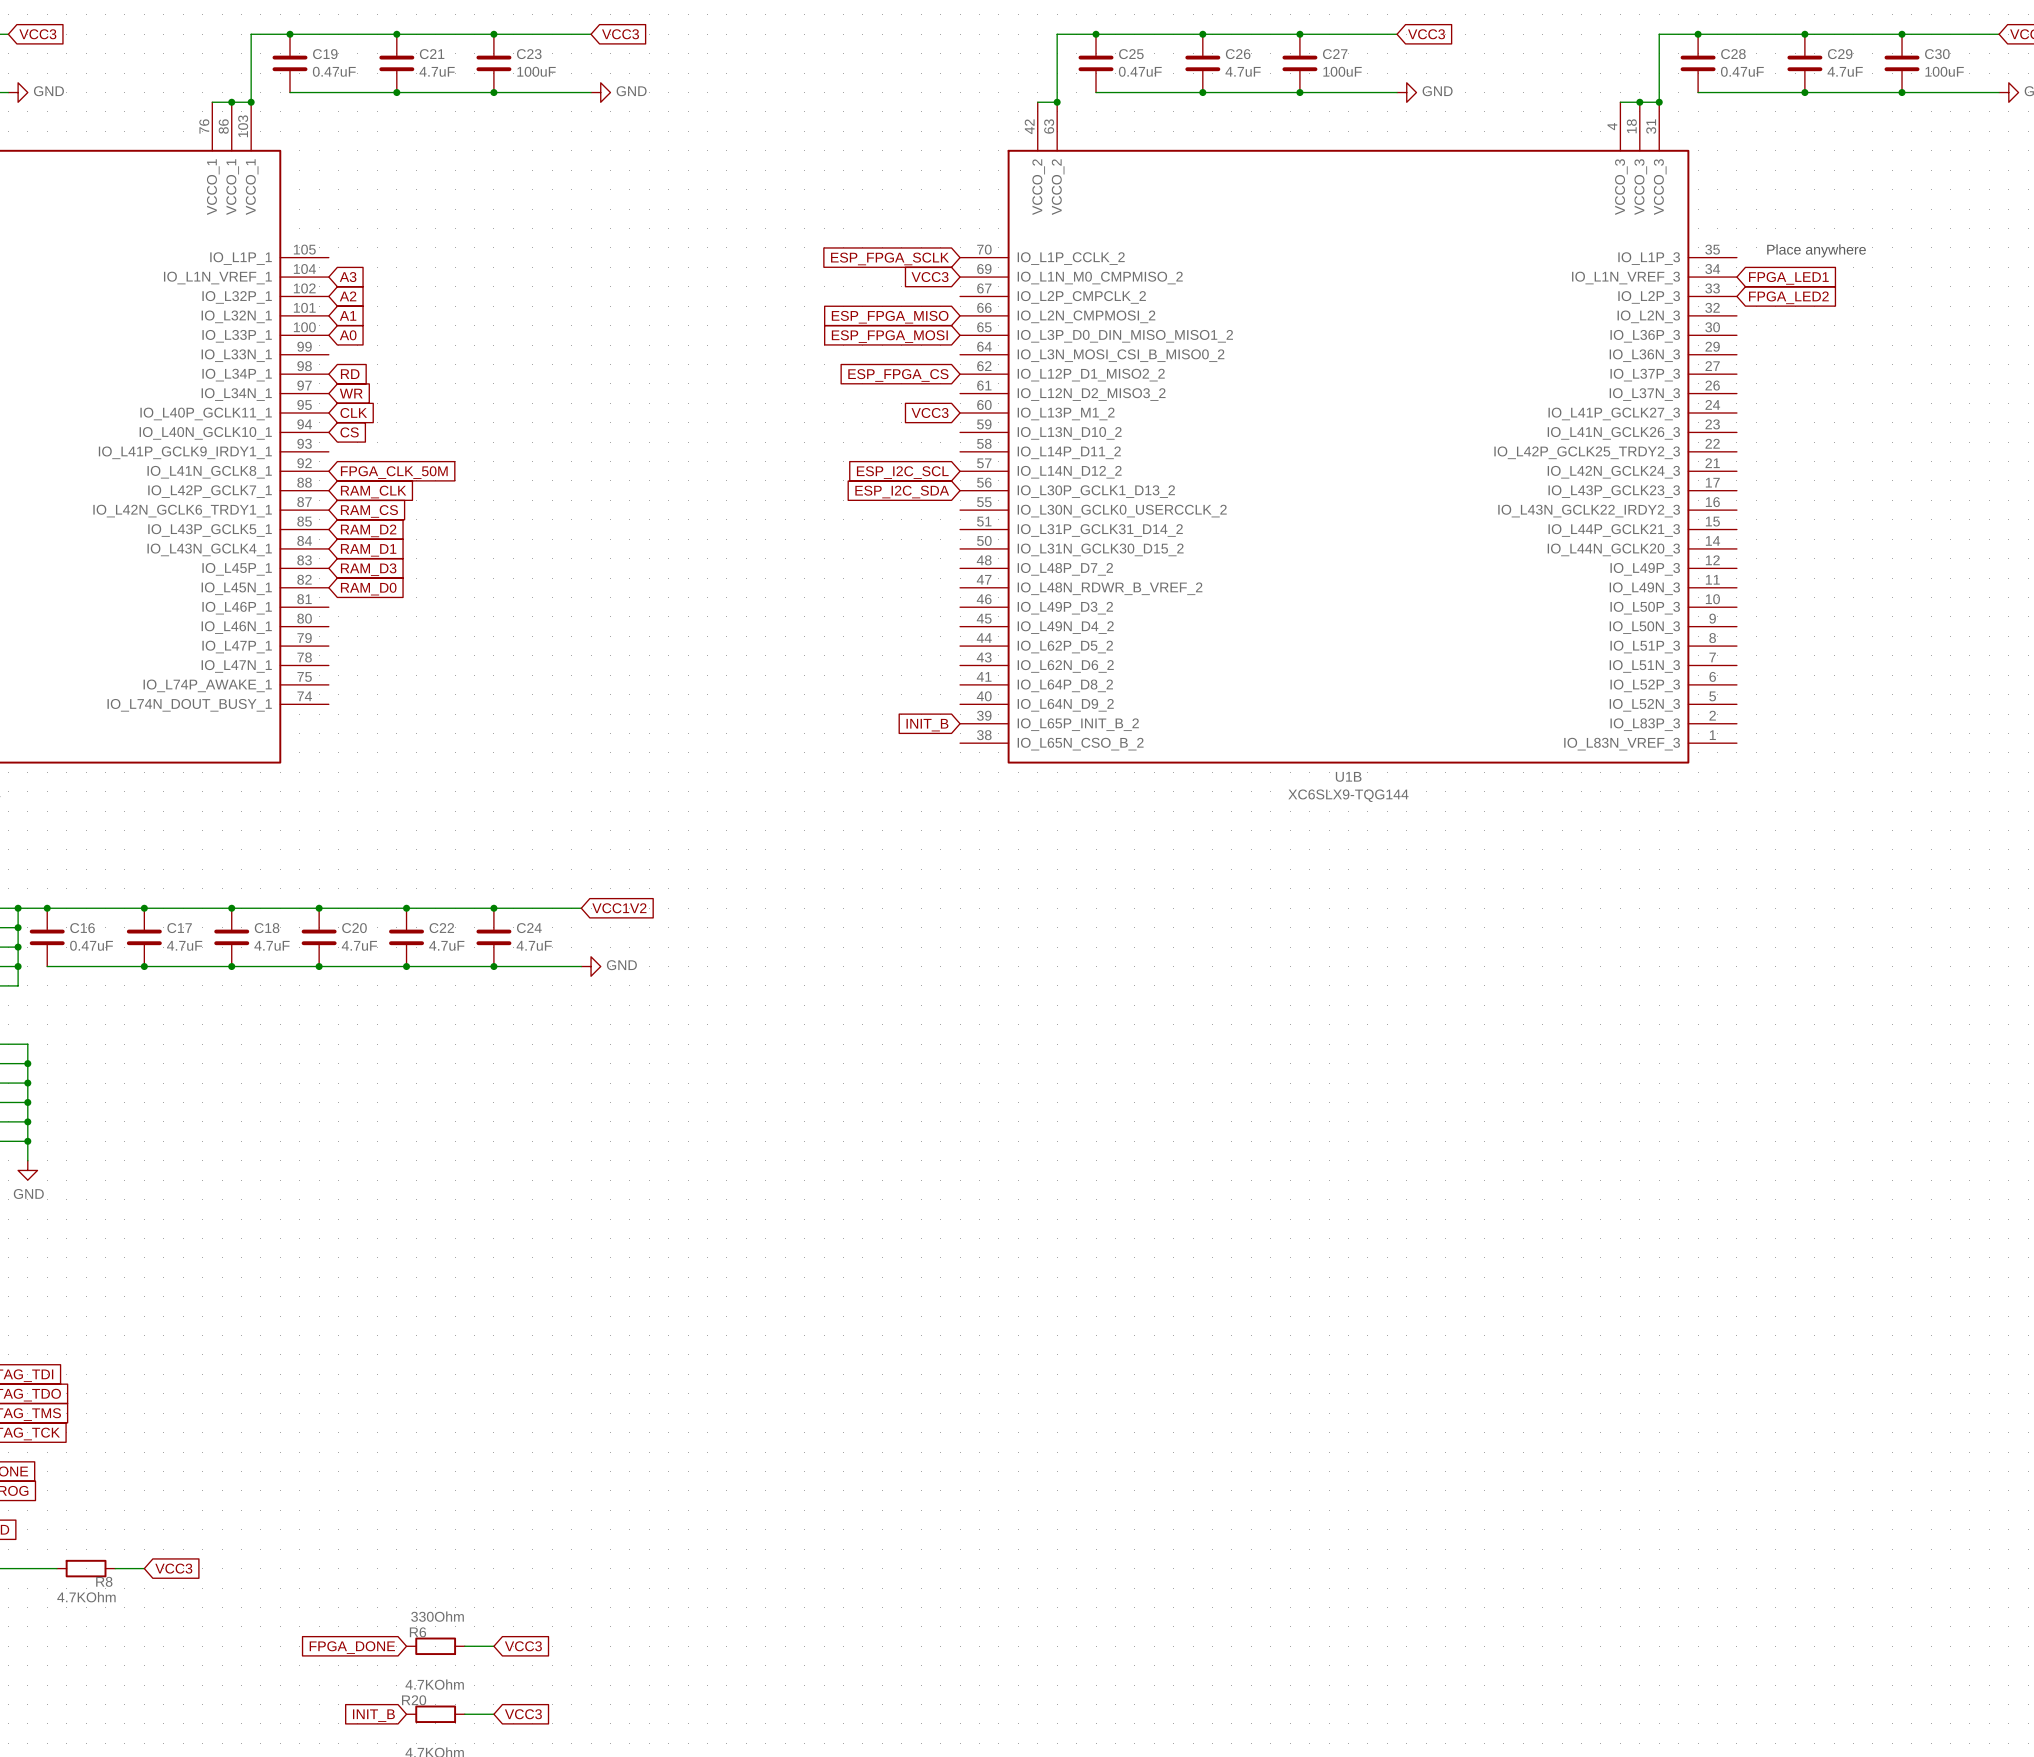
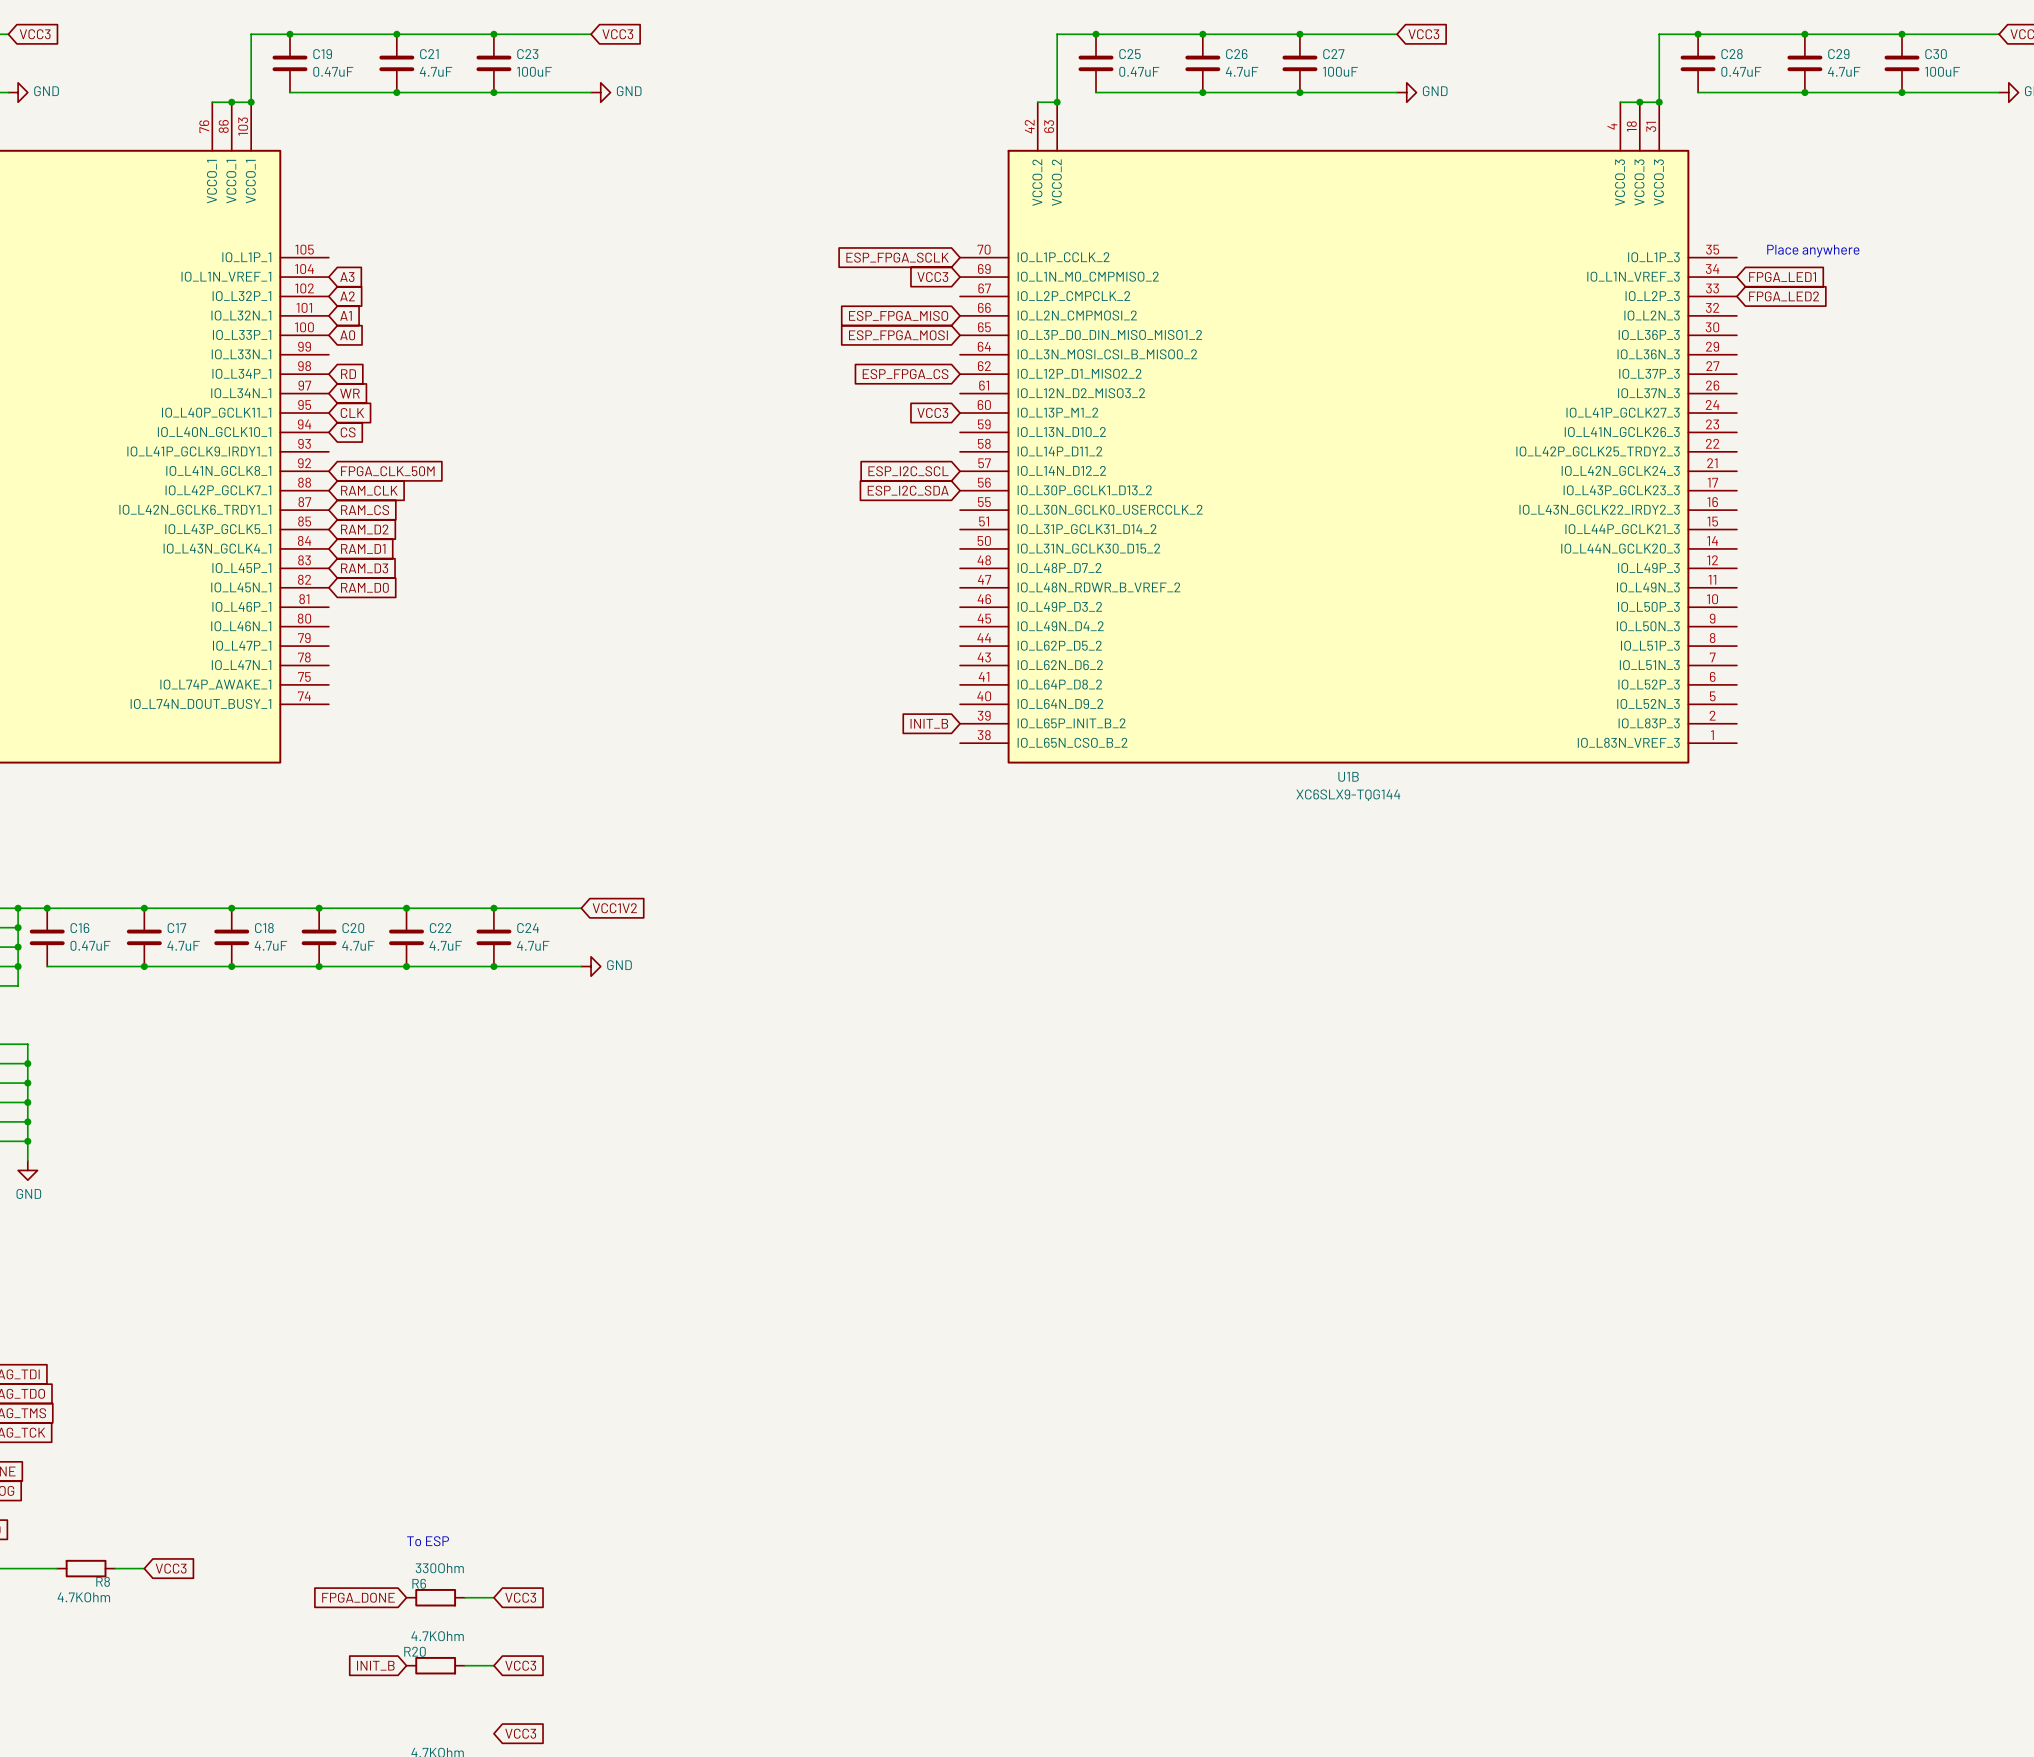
text: none -> To ESP (428, 1541)
global label: none -> VCC3 (520, 1597)
R6 position: (435, 1646) -> (435, 1597)
wire: (464, 1646) (493, 1646) -> (464, 1597) (493, 1597)
global label position: VCC3 (523, 1646) -> VCC3 (520, 1665)
global label position: FPGA_DONE (352, 1647) -> FPGA_DONE (358, 1597)
R20 position: (435, 1714) -> (435, 1665)
wire: (464, 1714) (493, 1714) -> (464, 1665) (493, 1665)
global label position: VCC3 (523, 1714) -> VCC3 (520, 1733)
global label position: INIT_B (373, 1715) -> INIT_B (375, 1665)

